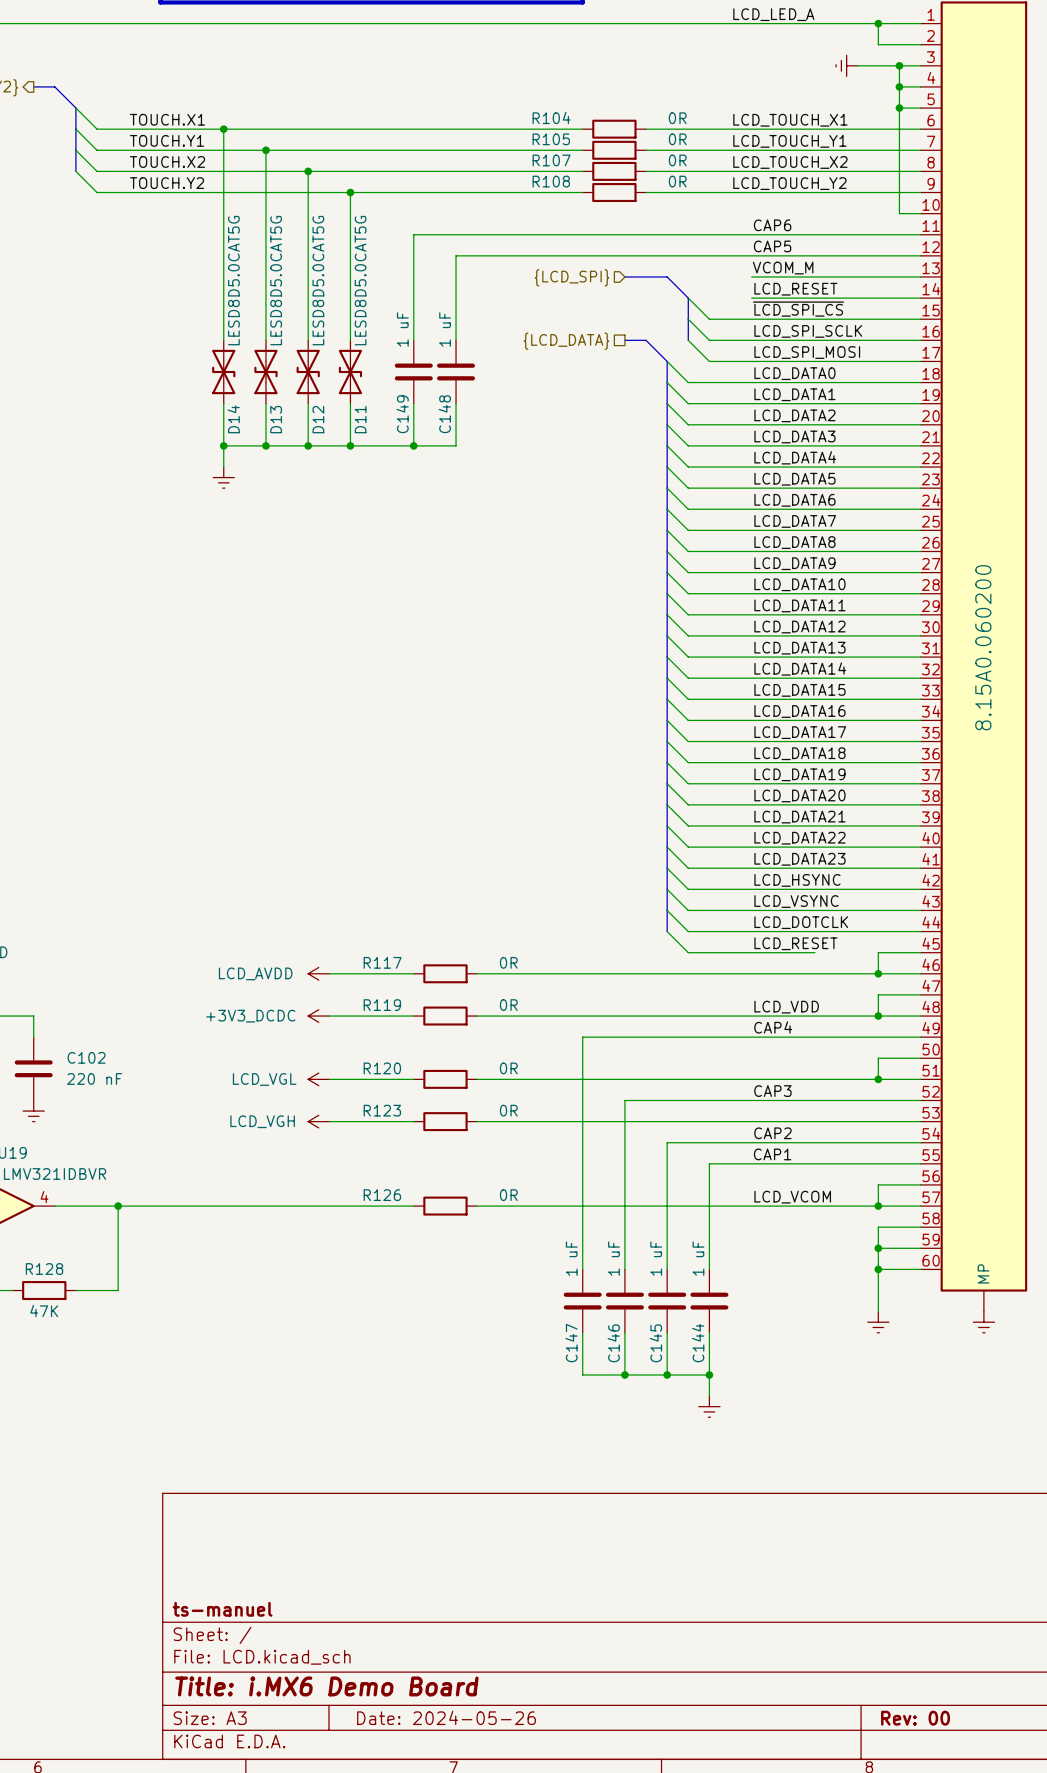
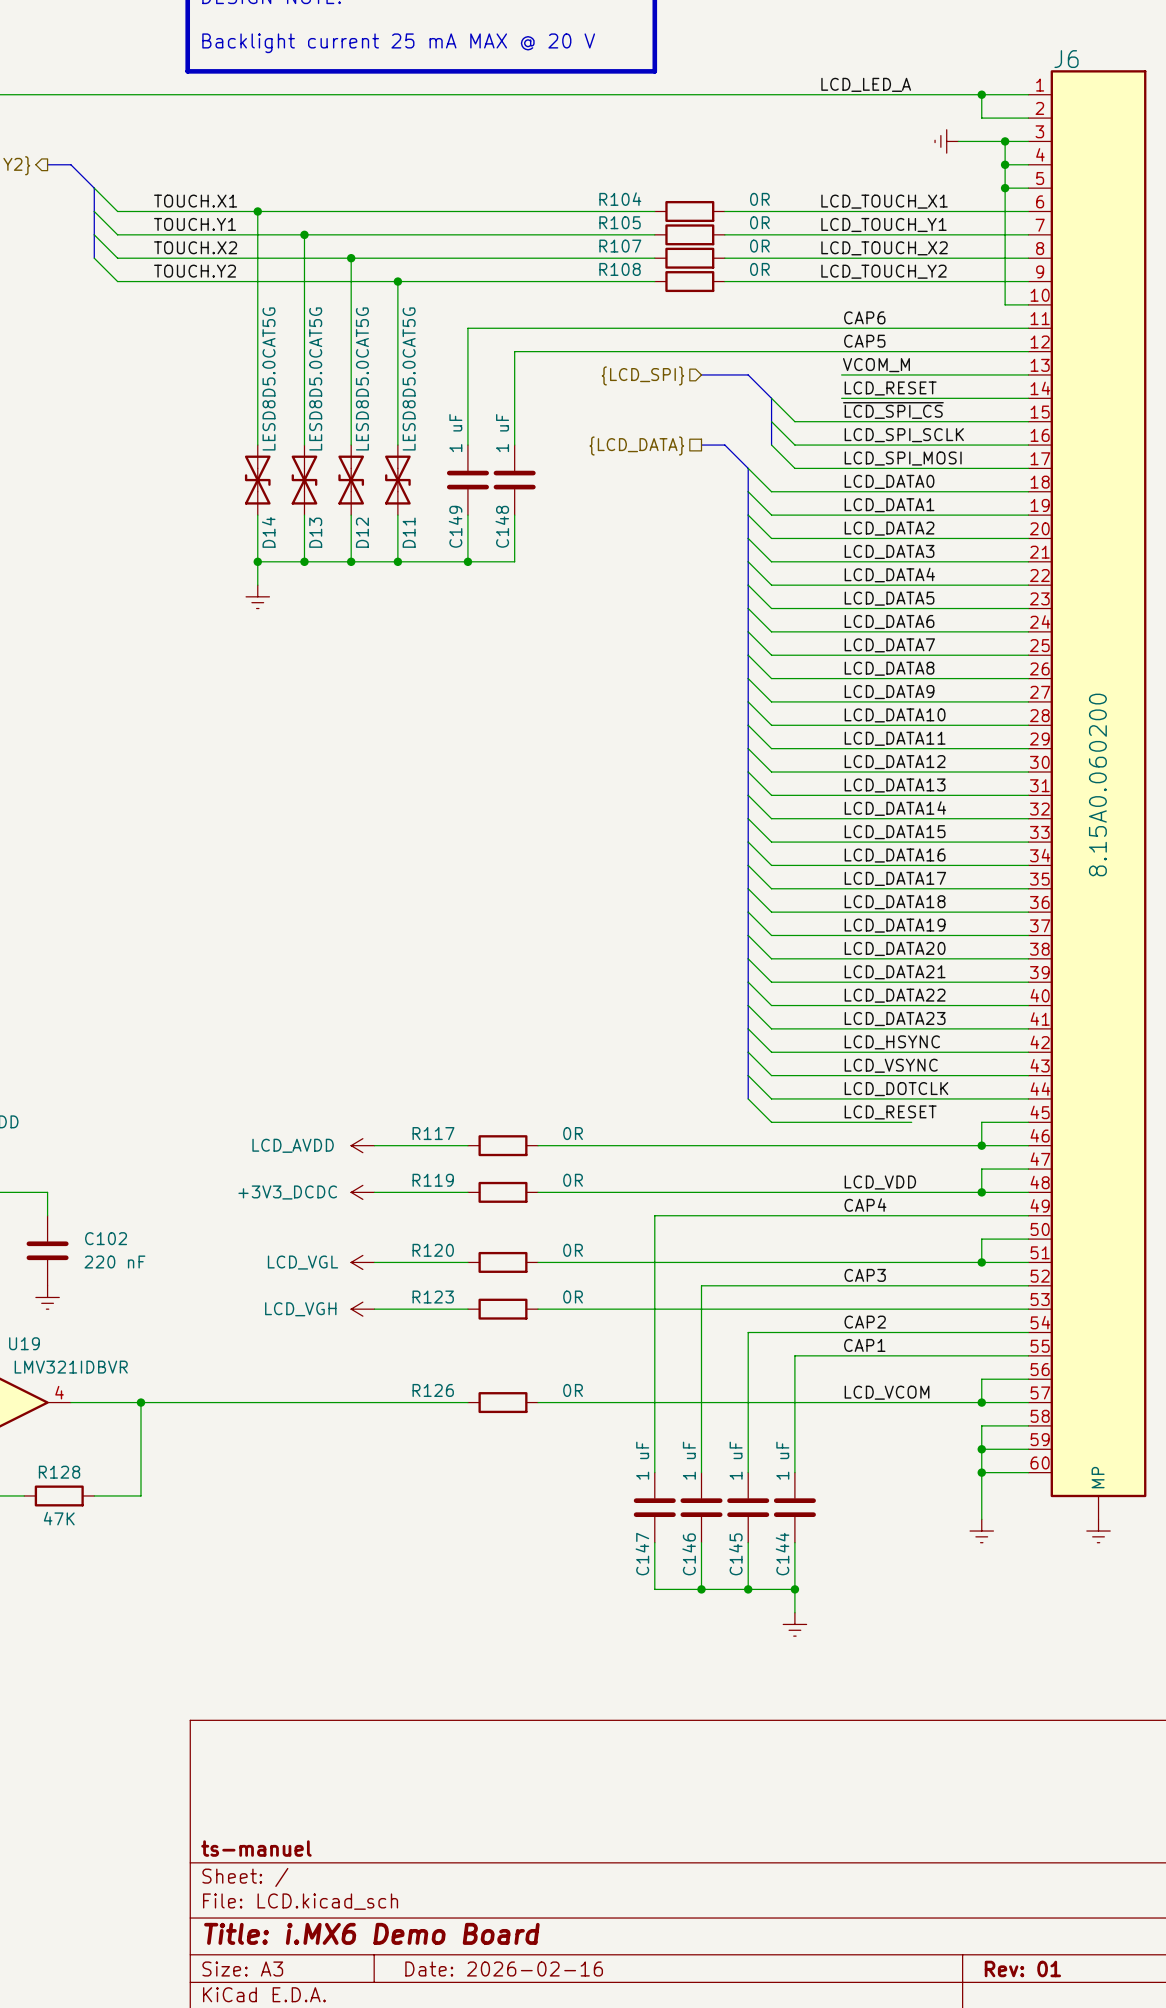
title block: Date: 2024-05-26 (446, 1717) -> Date: 2026-02-16 (504, 1968)
title block: Rev: 00 (915, 1718) -> Rev: 01 (1022, 1968)

